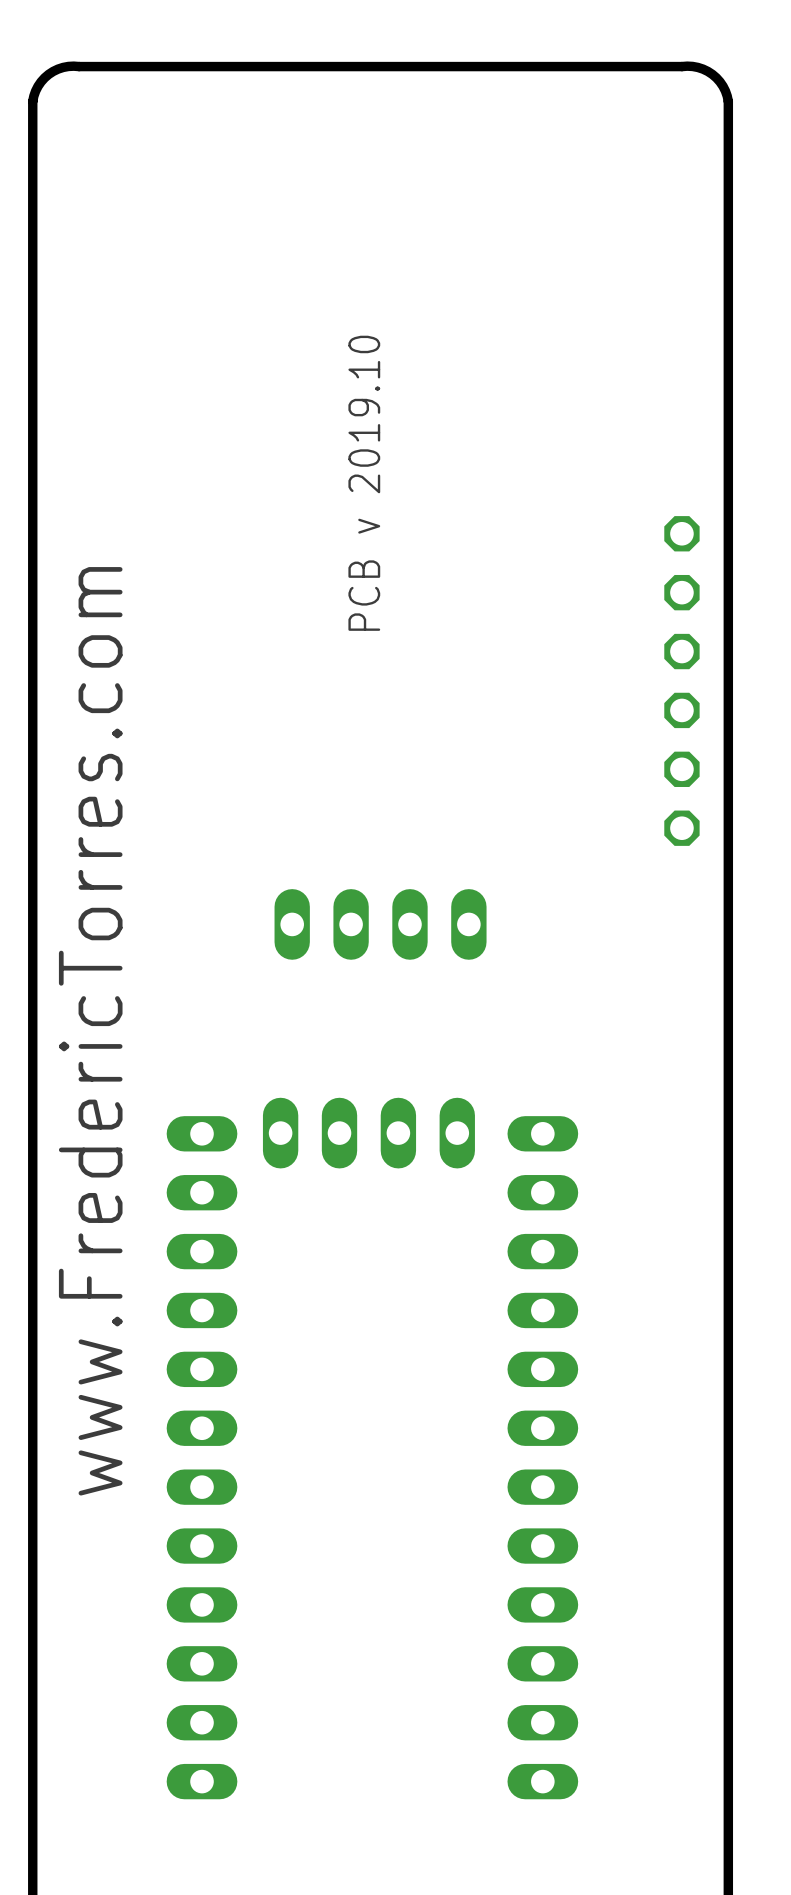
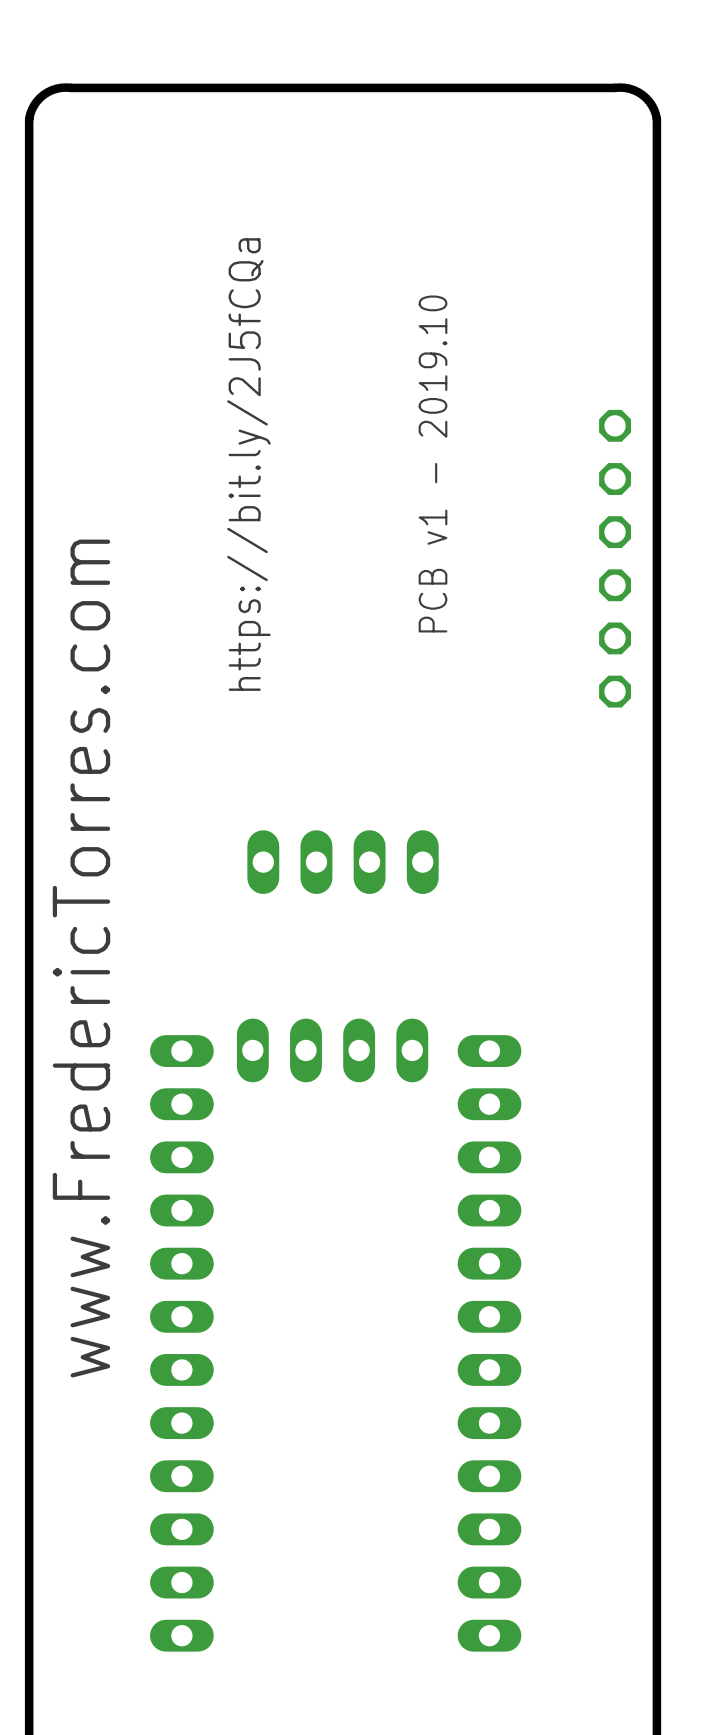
text: none -> https://bit.ly/2J5fCQa (248, 464)
text: PCB v 2019.10 (364, 483) -> none
text: none -> PCB v1 - 2019.10 (433, 463)
part position: (681, 680) -> (615, 558)

